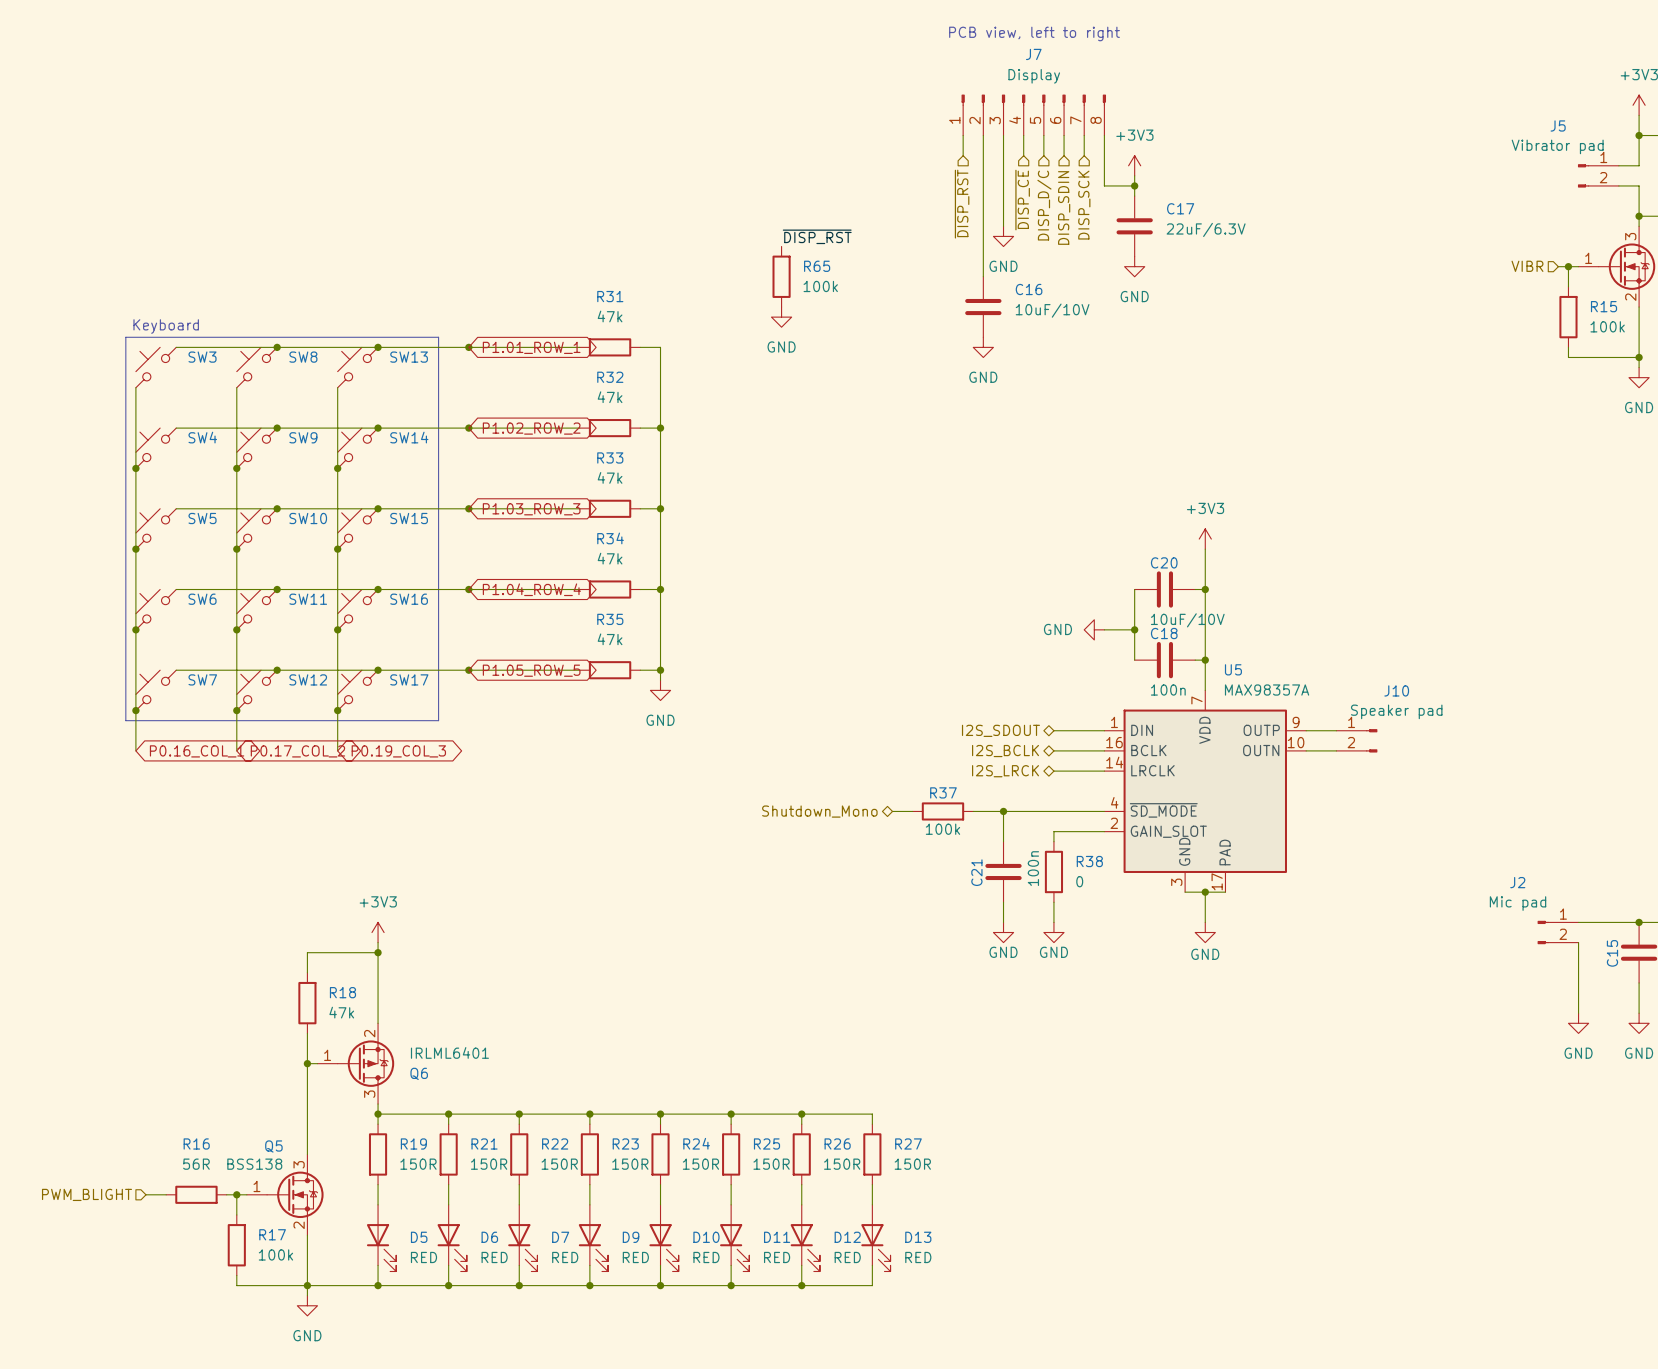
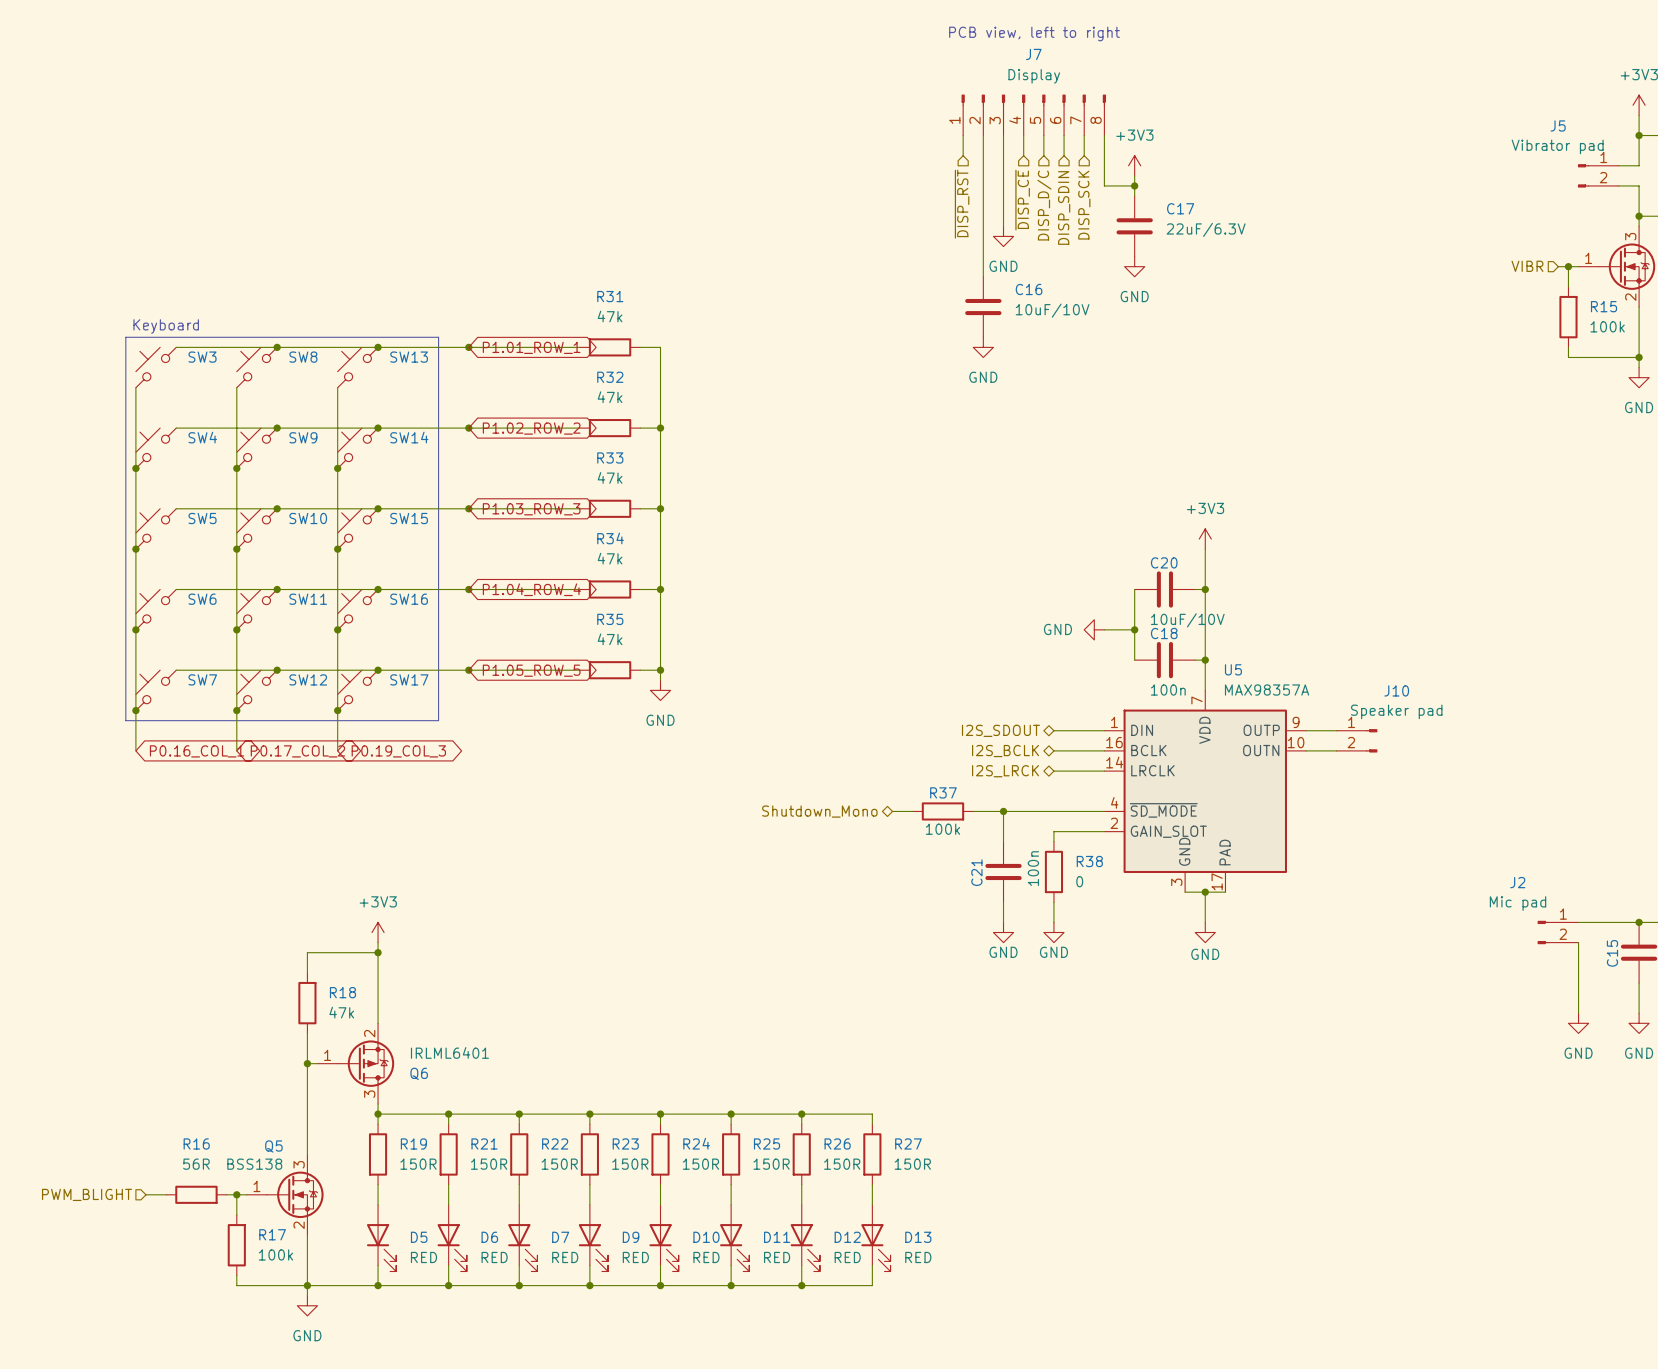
label: ~{DISP_RST} (817, 236) -> none
R65: 100k (781, 276) -> none
power symbol: GND (781, 317) -> none

